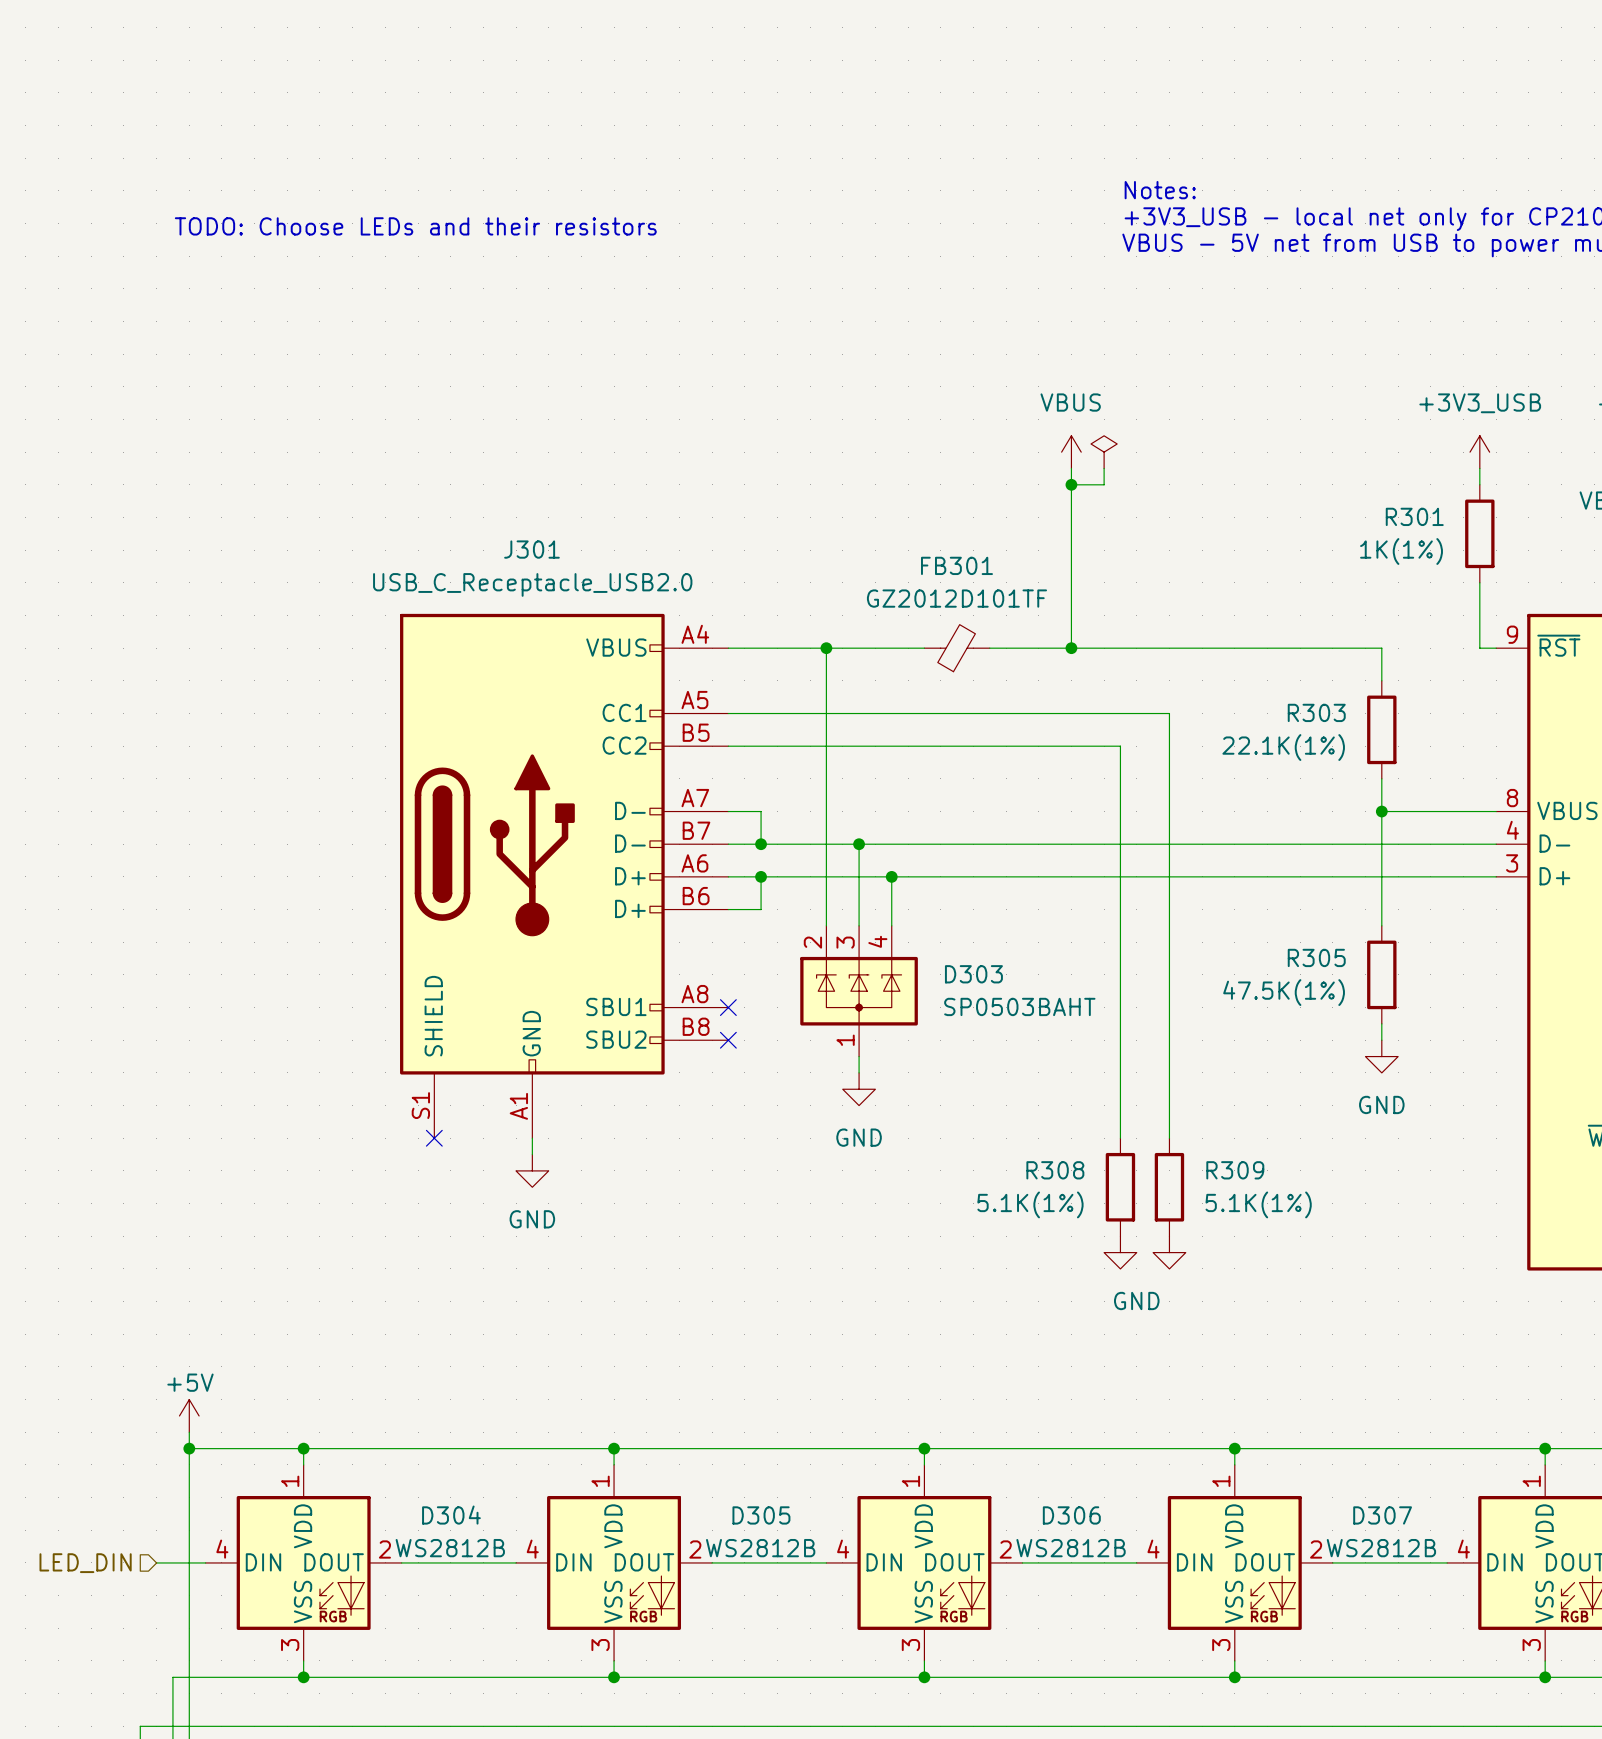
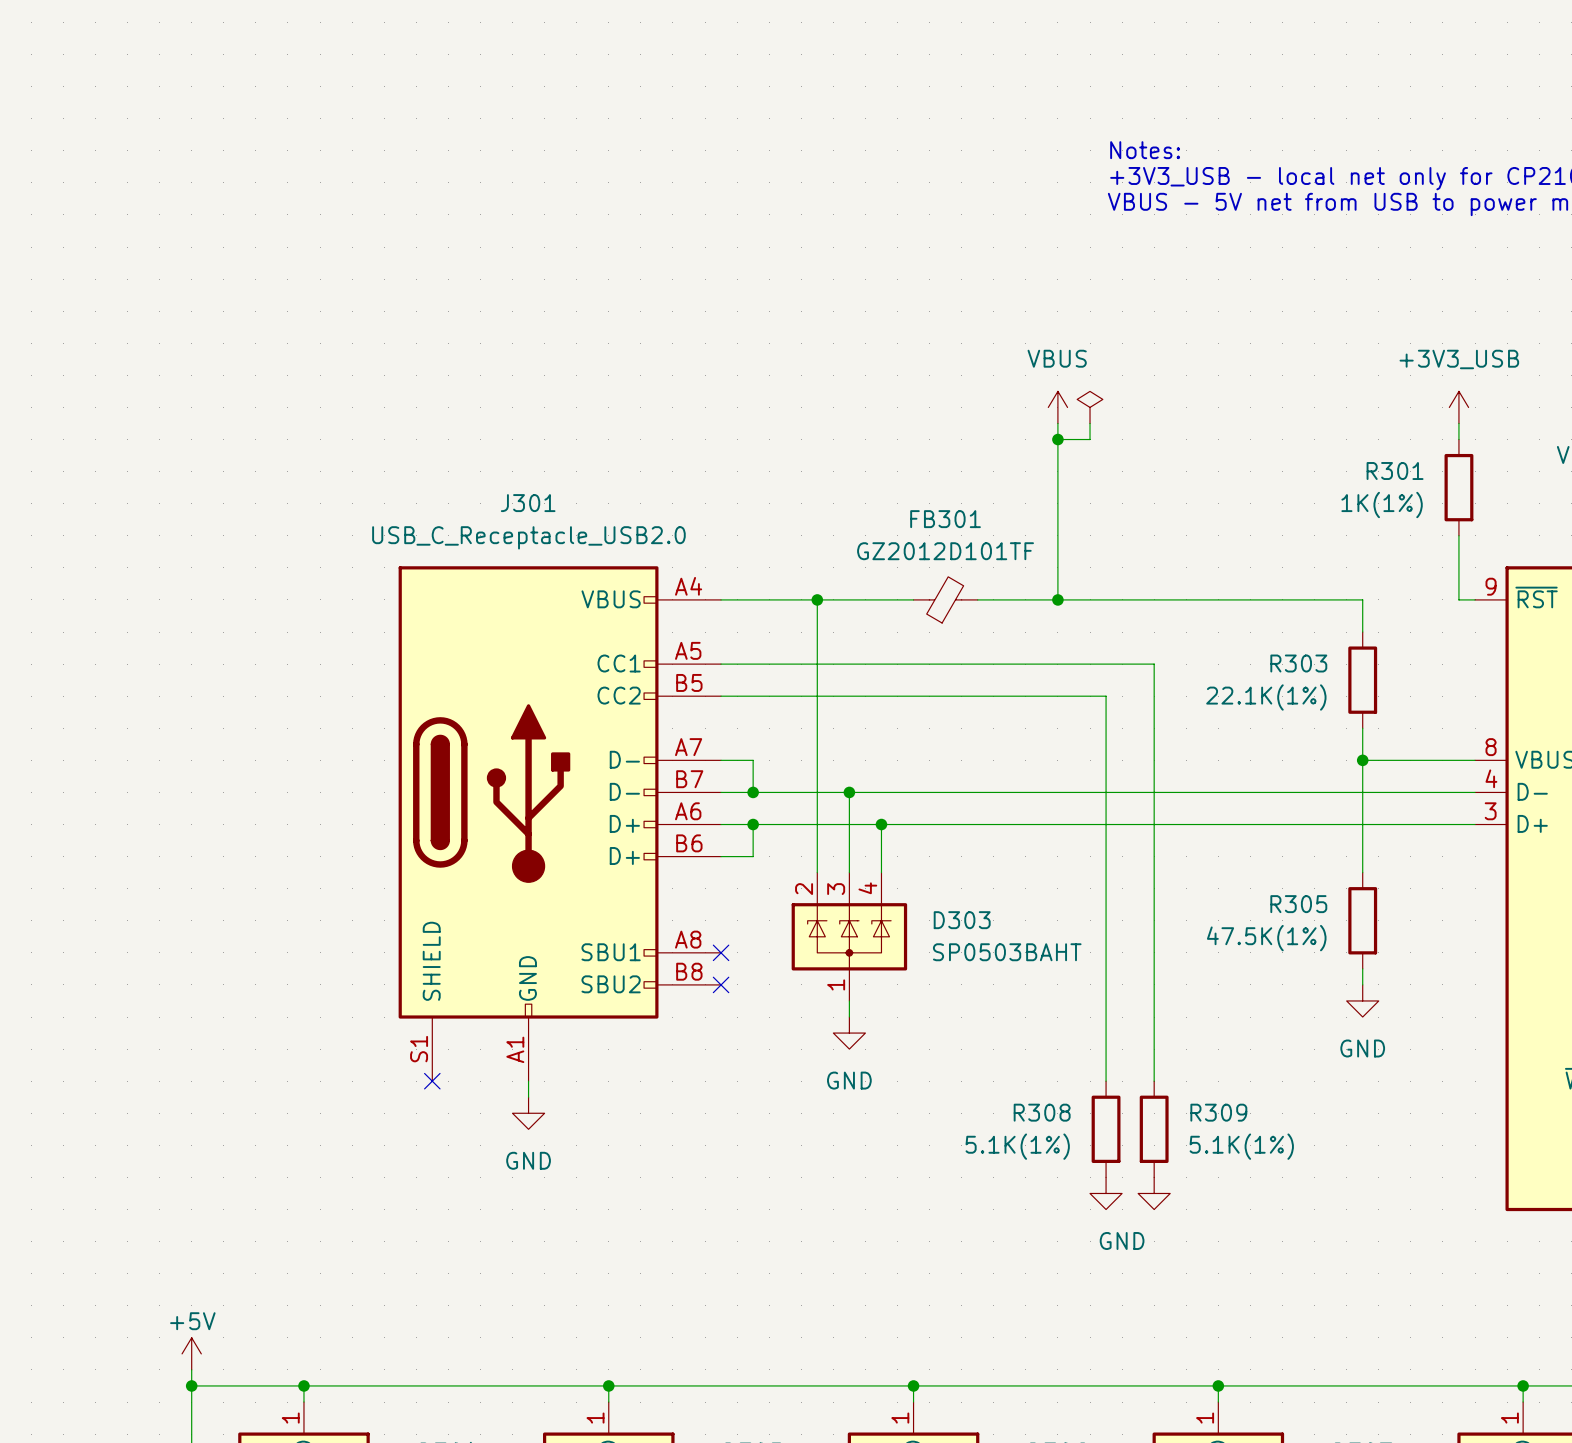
text: TODO: Choose LEDs and their resistors (415, 226) -> none

